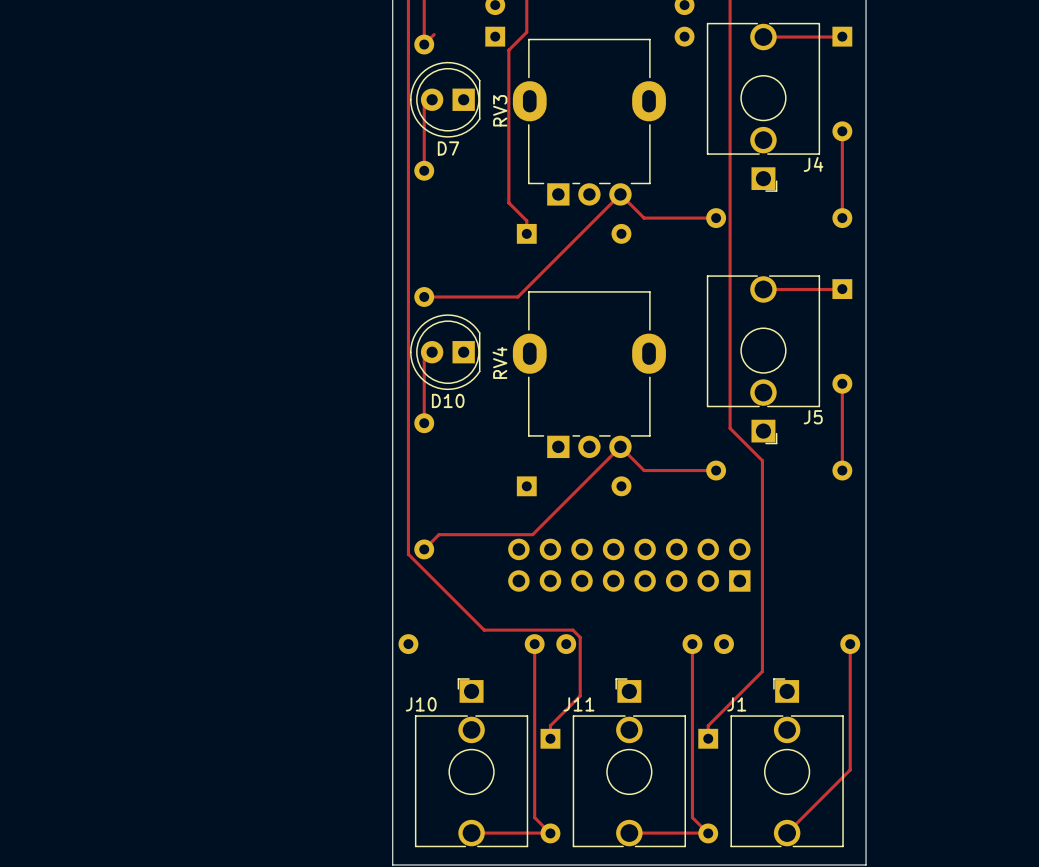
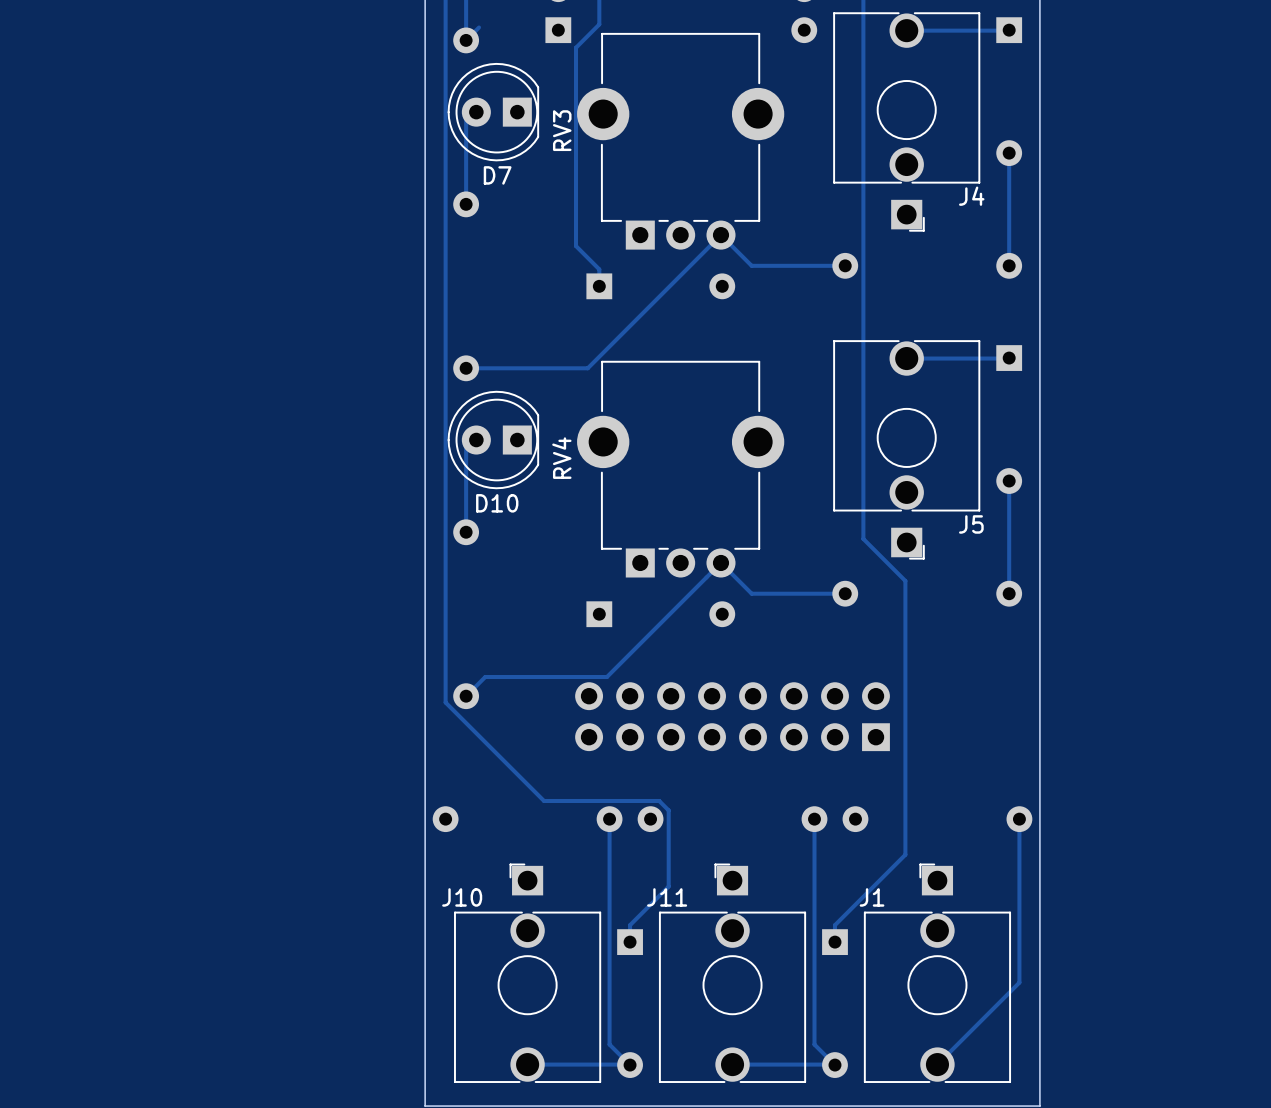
RV3 footprint: [512, 38, 666, 206] -> [577, 32, 785, 250]
RV4 footprint: [512, 291, 666, 459] -> [577, 360, 785, 578]

